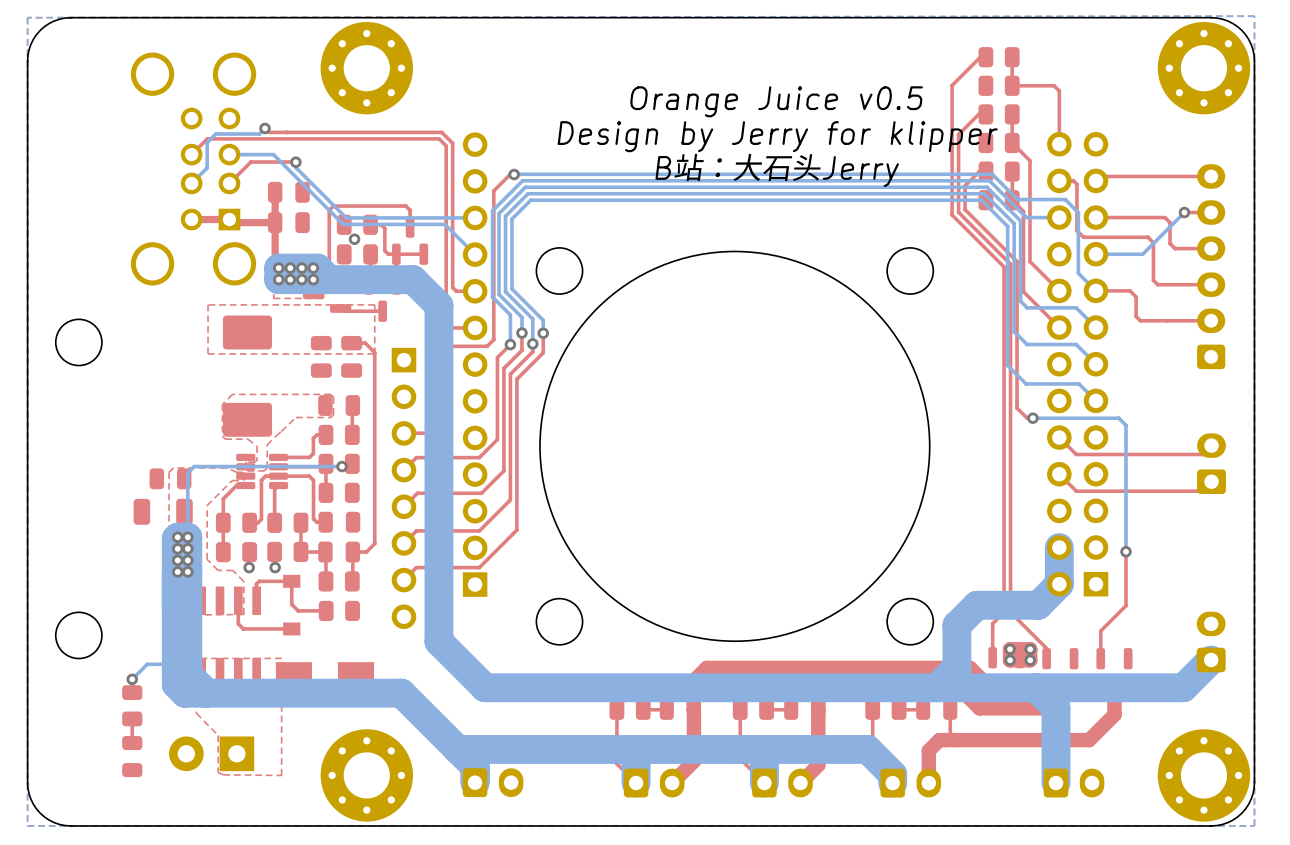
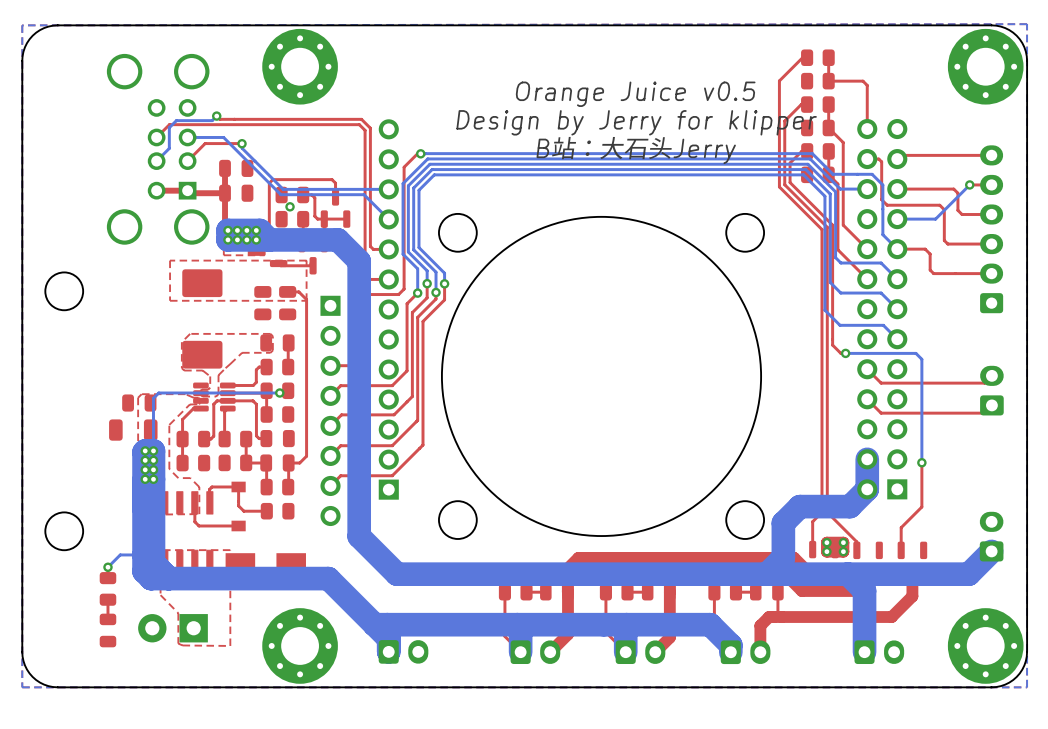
via: (249, 567) -> none
via: (275, 567) -> none

